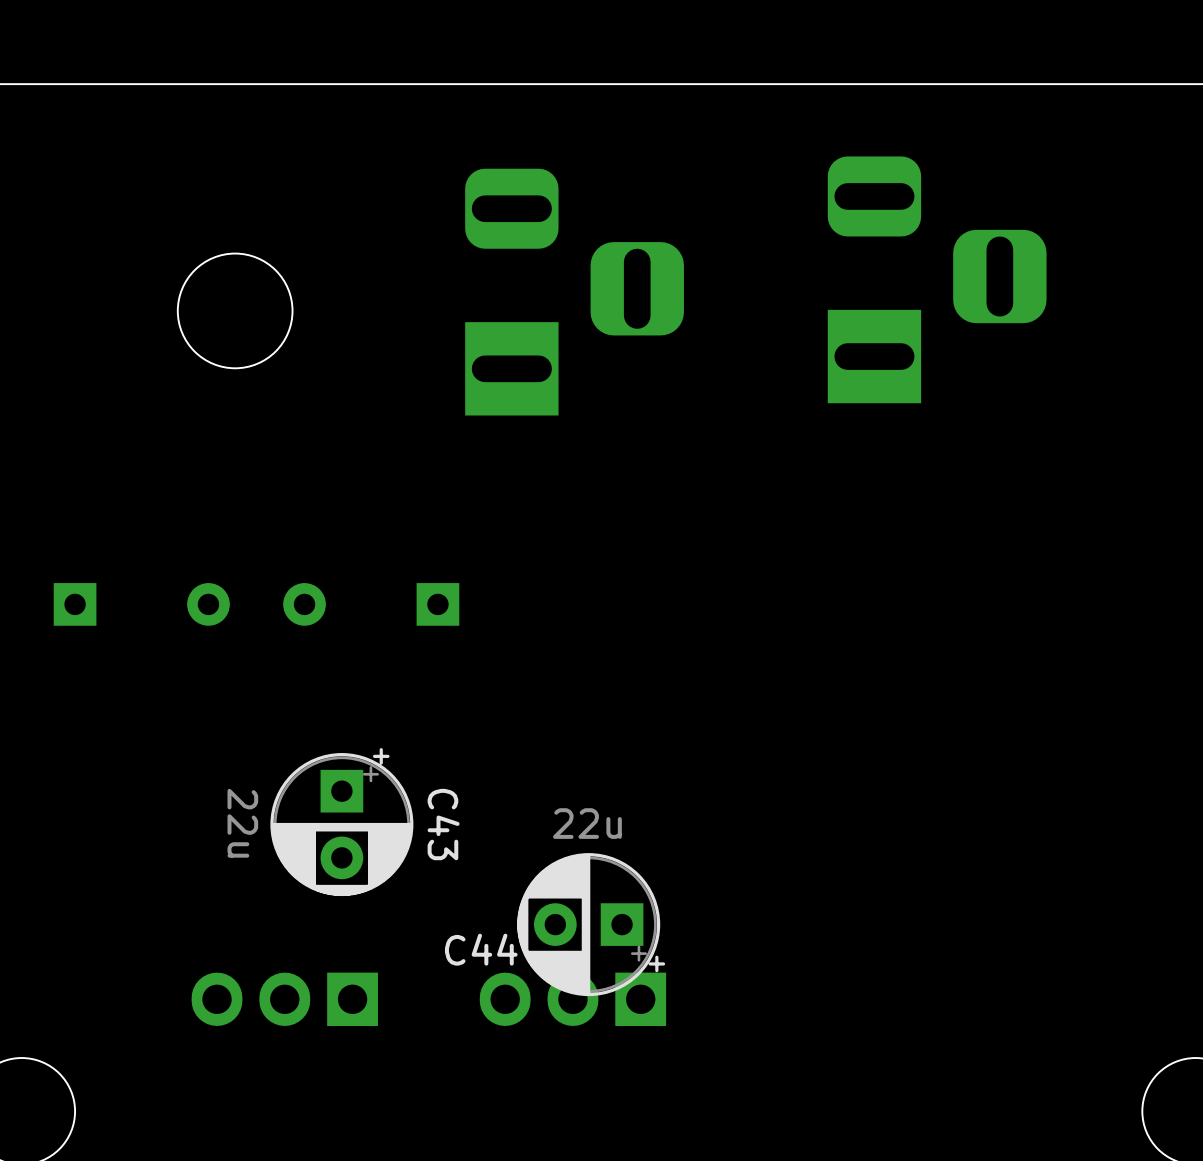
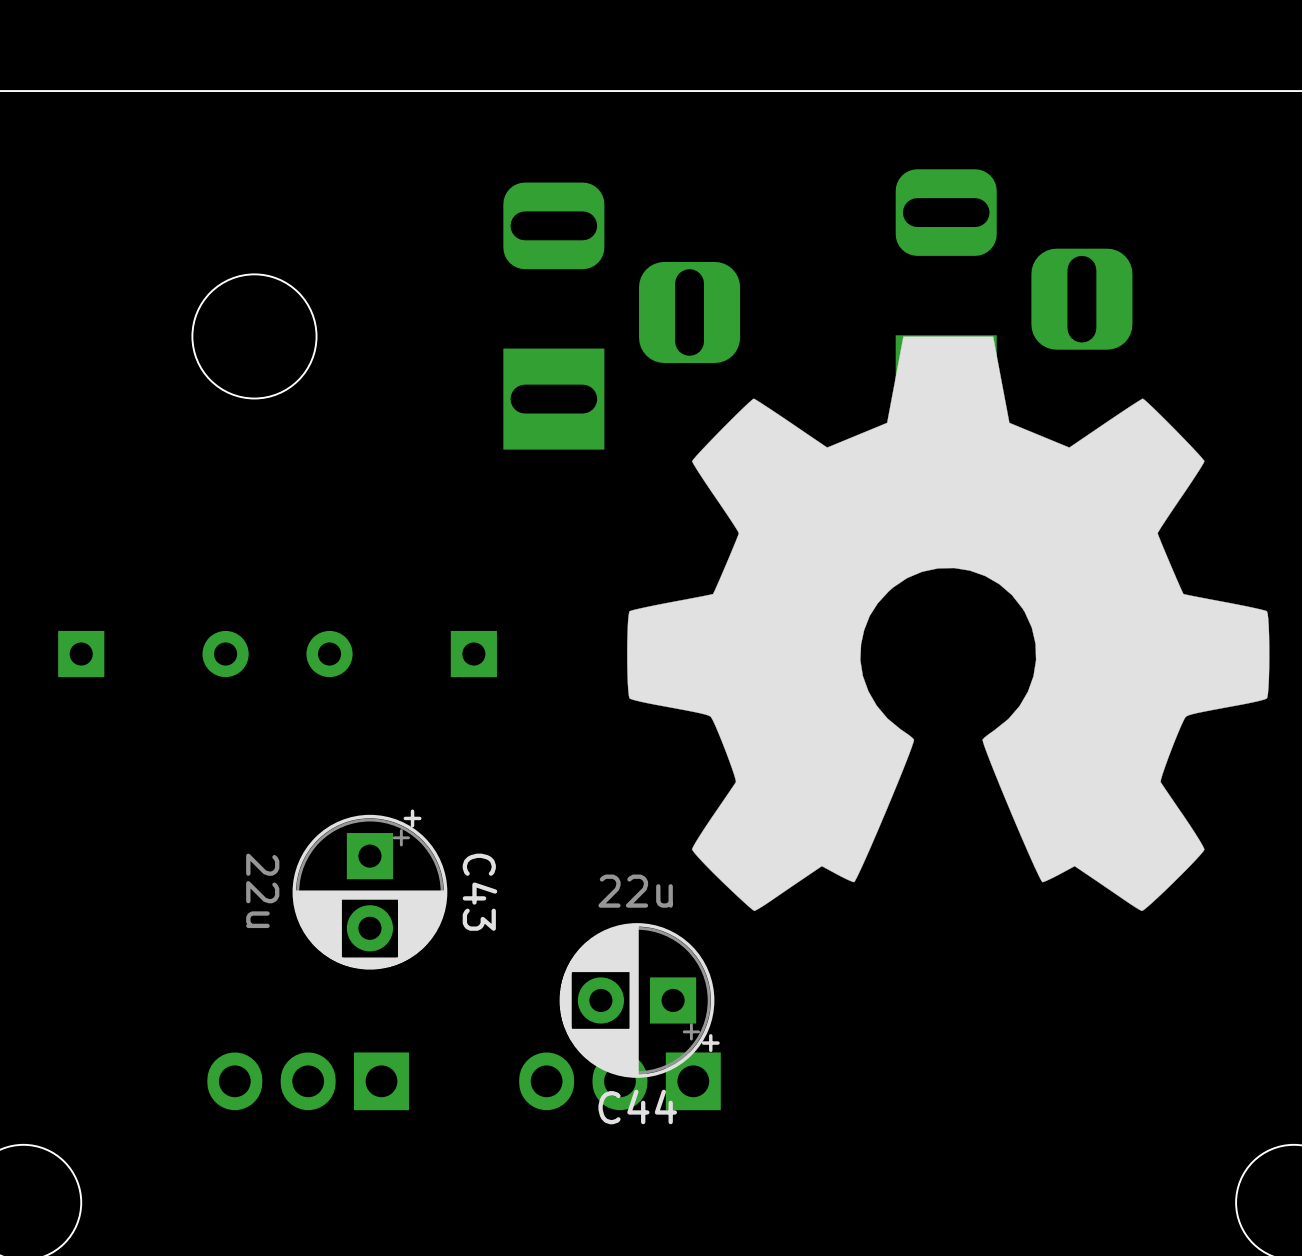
drawing: none -> [627, 336, 1270, 912]
C44 name position: C44 (481, 949) -> C44 (637, 1106)

